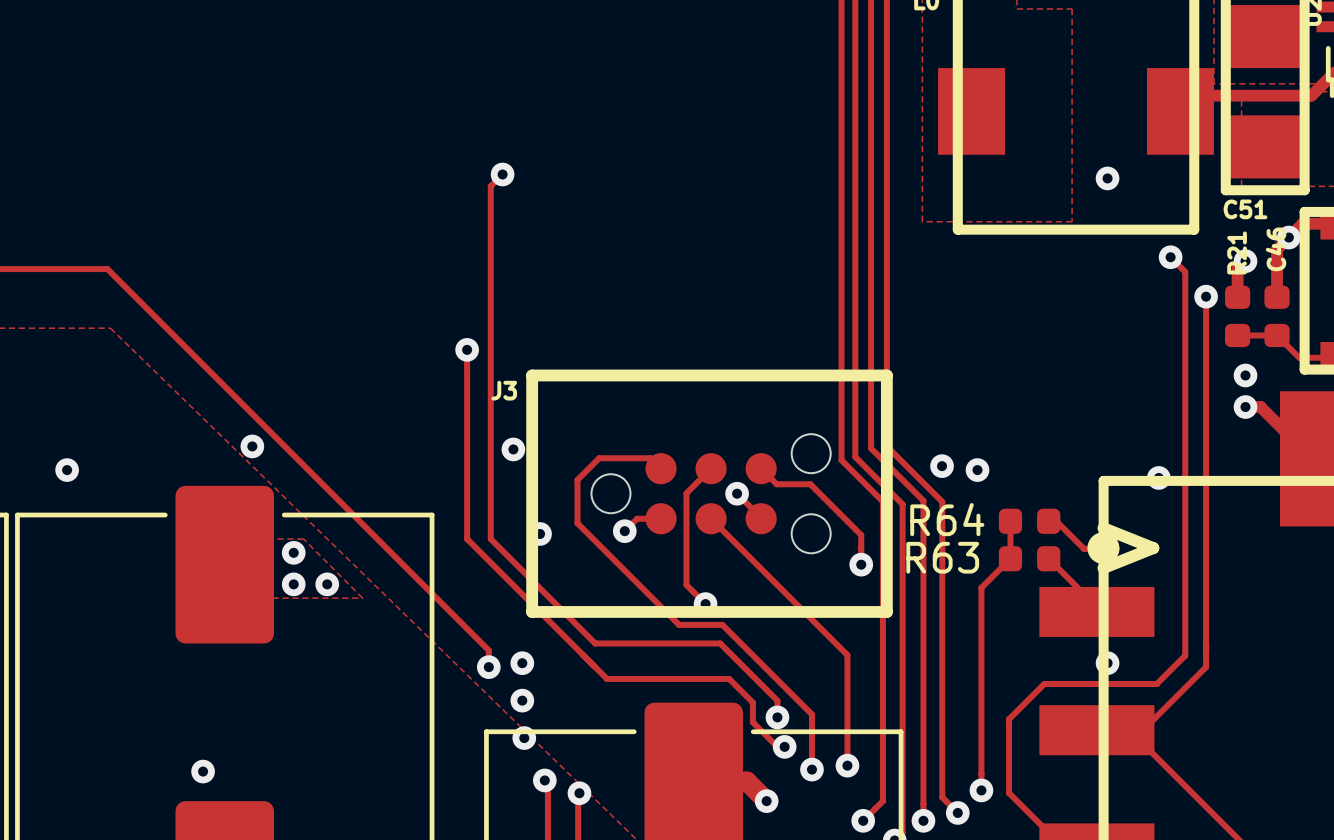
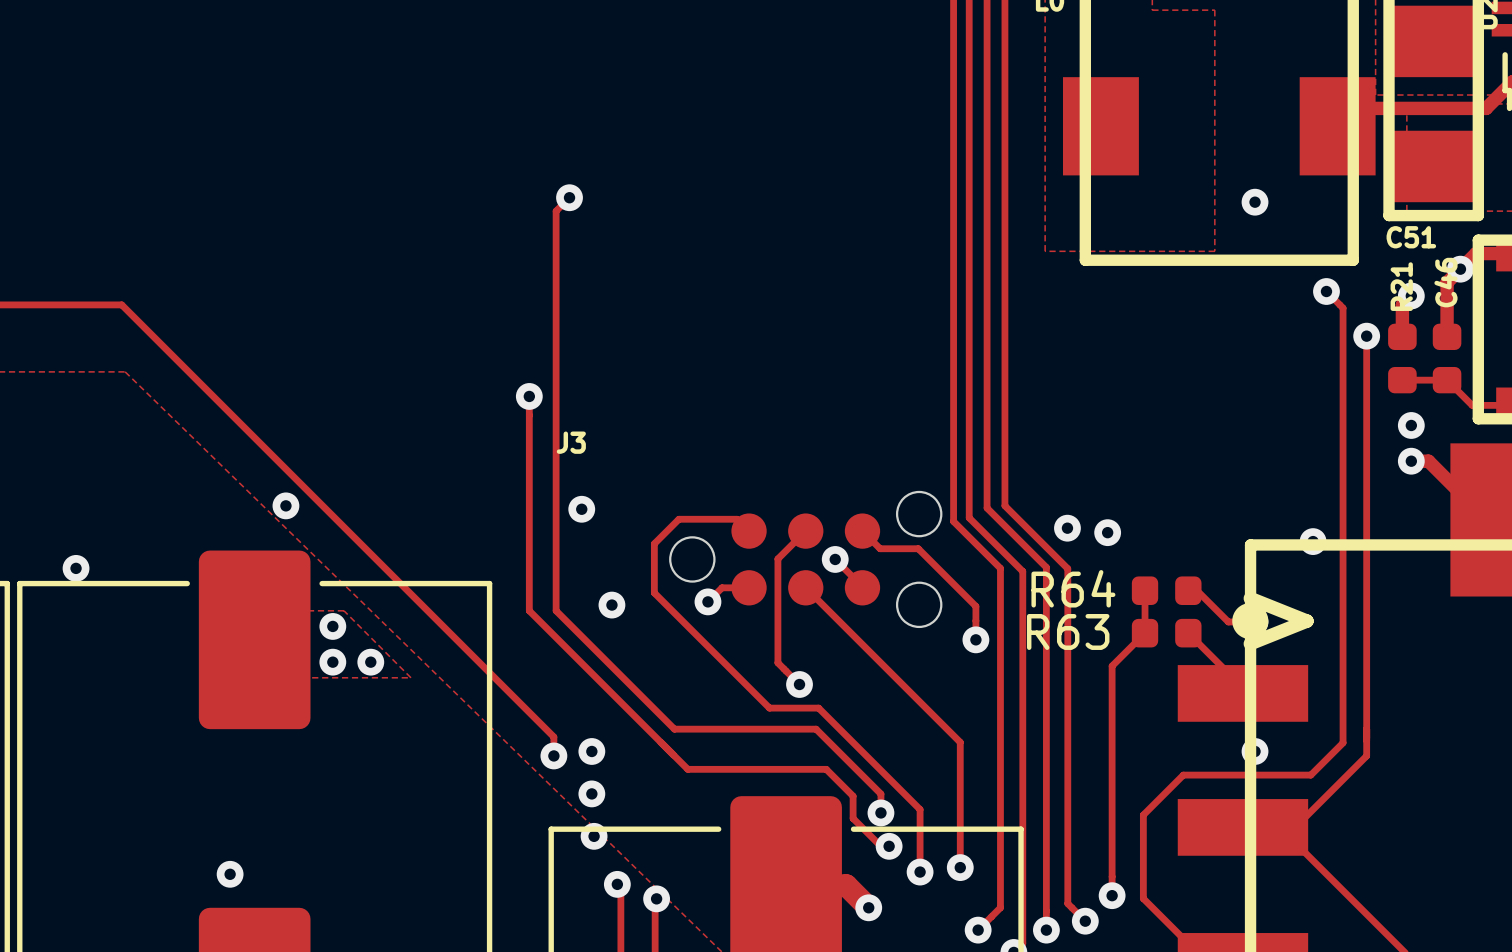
J3 footprint: [526, 369, 893, 618] -> [669, 490, 943, 629]
via position: (67, 470) -> (76, 568)

